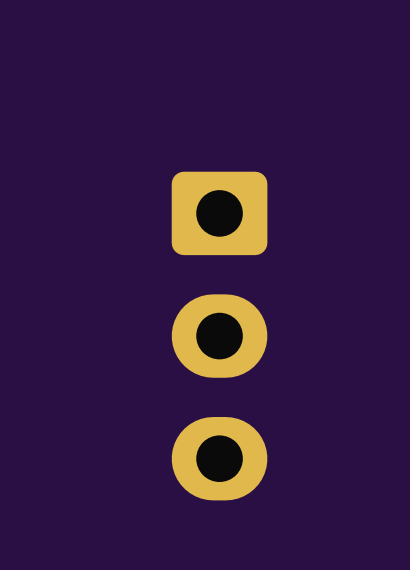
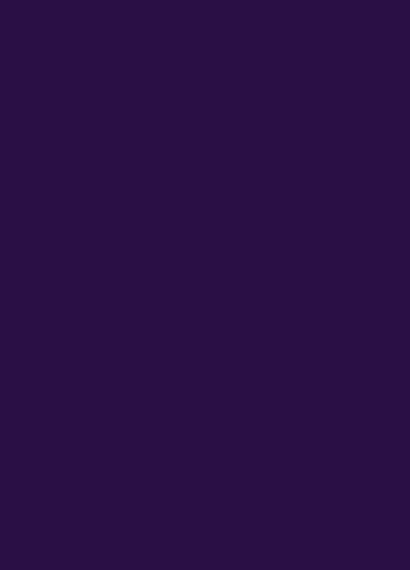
part: (219, 336) -> none

